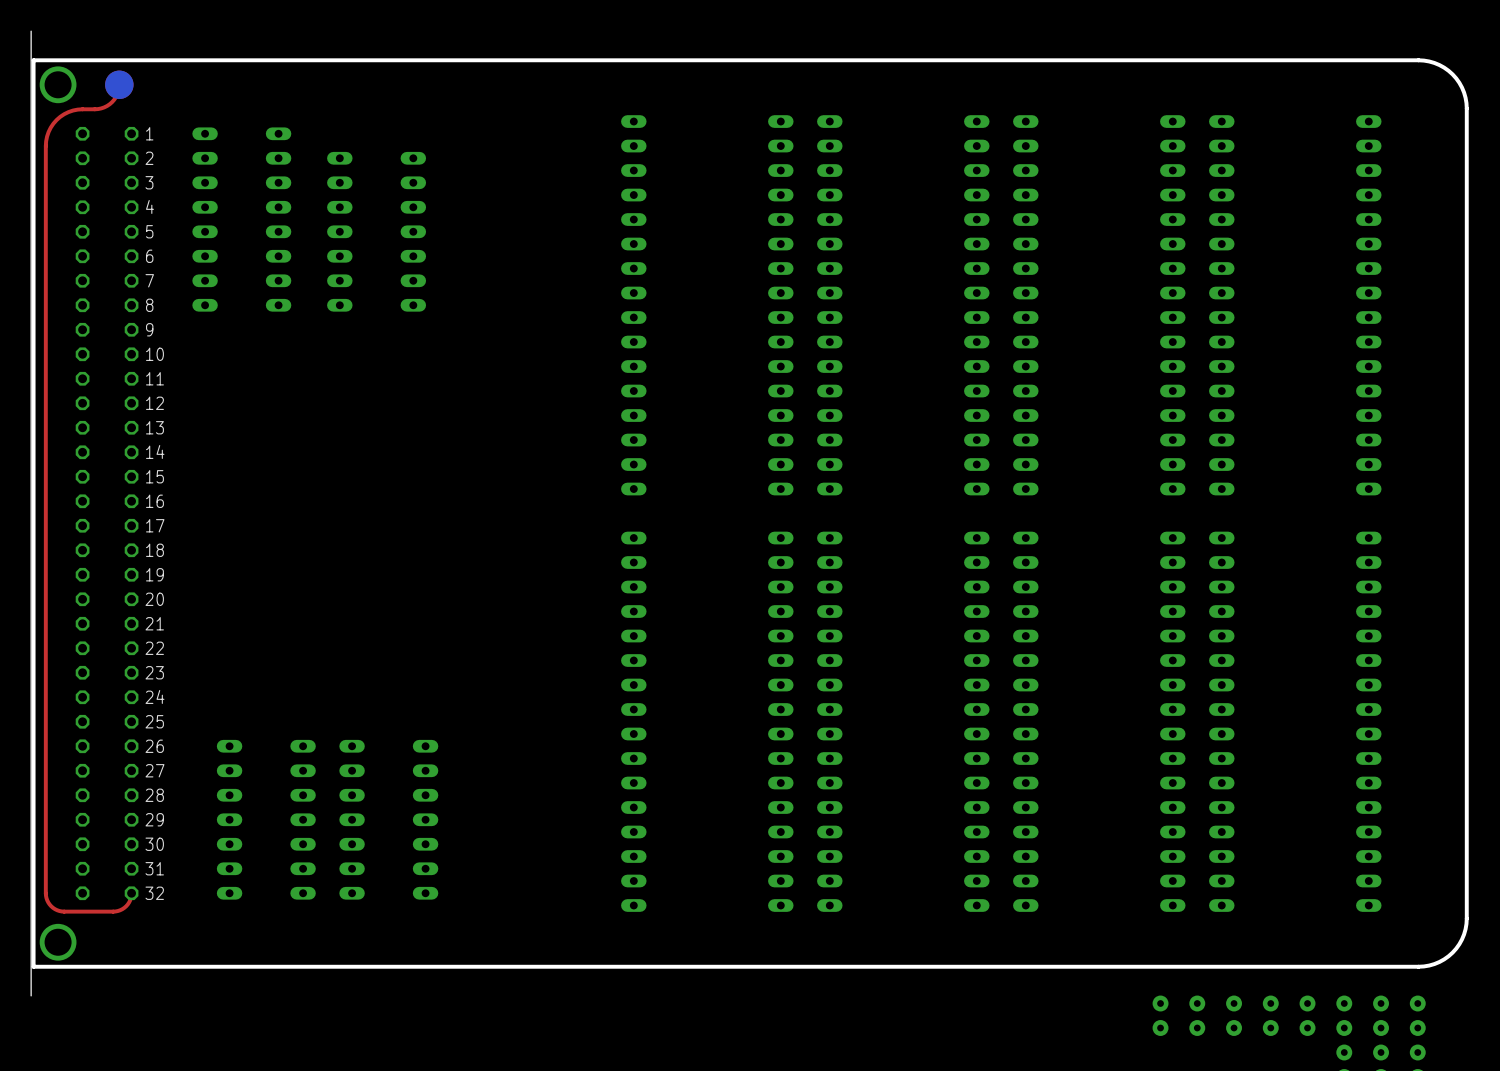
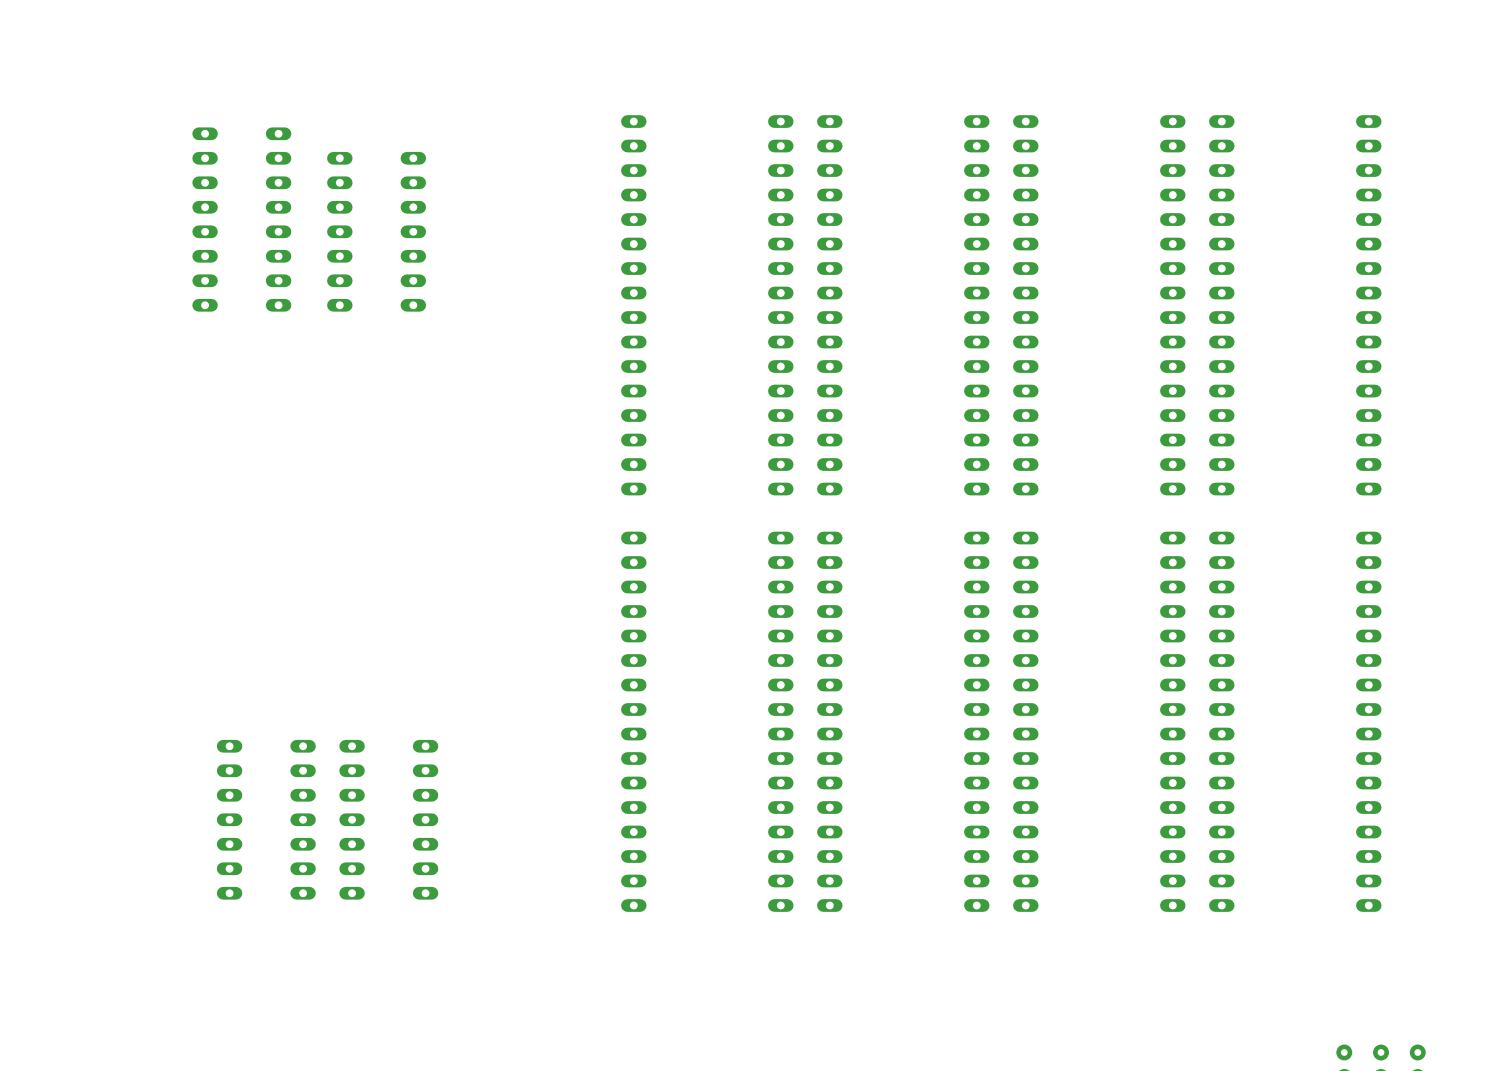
part: (749, 513) -> none
part: (1160, 1015) -> none
part: (1197, 1015) -> none
part: (1234, 1015) -> none
part: (1270, 1015) -> none
part: (1307, 1015) -> none
part: (1344, 1015) -> none
part: (1381, 1015) -> none
part: (1417, 1015) -> none

